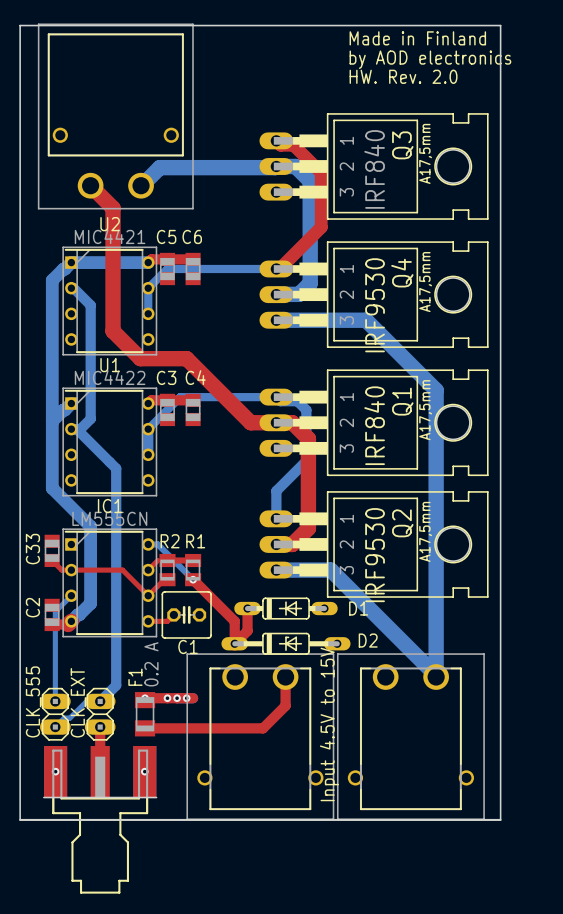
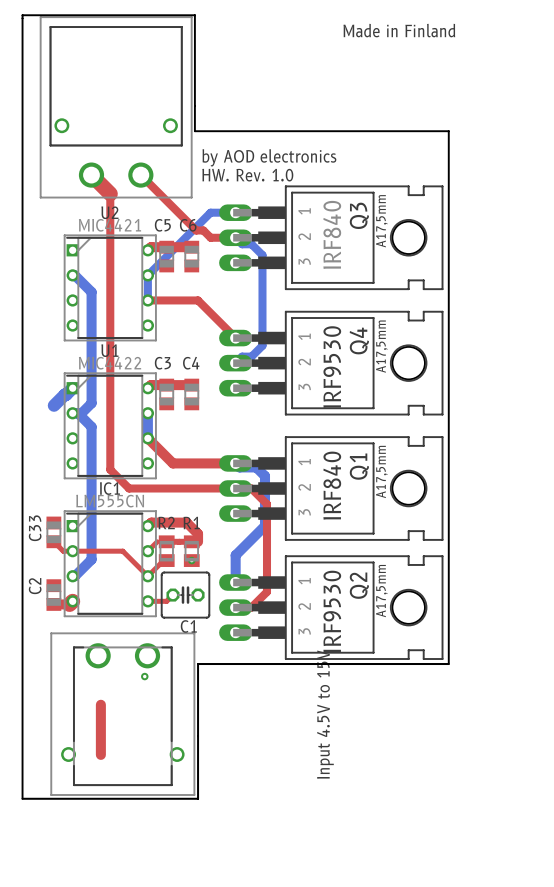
board edge: (20, 25) (500, 25) (500, 819) (20, 819) -> (22, 18) (22, 15) (194, 15) (194, 131) (448, 131) (448, 664) (198, 664) (198, 798) (22, 798) (22, 795)
text position: by AOD electronics (430, 59) -> by AOD electronics (269, 157)
text: HW. Rev. 2.0 (403, 76) -> none
top track: (276, 140) (280, 145) (293, 145) (321, 172) (321, 227) (279, 268) (276, 268) -> none
Q3 position: (373, 166) -> (331, 237)
top track: none -> (140, 175) (196, 230) (203, 230) (210, 237) (235, 237)
bottom track: (141, 185) (159, 167) (295, 166) (310, 181) (310, 283) (299, 294) (276, 294) -> none
text: none -> HW. Rev. 1.0 (247, 175)
top track: (109, 204) (113, 208) (113, 331) (140, 358) (186, 358) (250, 422) (292, 422) (308, 438) (308, 528) (292, 544) (276, 544) -> (110, 193) (110, 469) (129, 488) (251, 488) (267, 504) (267, 591) (251, 607) (235, 607)
bottom track: none -> (235, 237) (242, 244) (251, 244) (262, 255) (262, 345) (251, 356) (242, 356) (235, 363)
bottom track: (148, 262) (71, 262) (52, 280) (52, 488) (90, 526) (90, 603) (71, 621) -> none
bottom track: (167, 268) (276, 268) -> (166, 256) (210, 212) (235, 212)
Q4 position: (373, 294) -> (331, 363)
top track: none -> (147, 300) (198, 300) (235, 338)
bottom track: (276, 320) (366, 320) (436, 390) (436, 677) -> none
Q1 position: (373, 422) -> (331, 488)
bottom track: (148, 429) (180, 397) (276, 397) (280, 401) (297, 401) (306, 410) (306, 461) (276, 491) (276, 518) -> none
bottom track: (90, 443) (116, 468) (116, 685) (100, 701) (86, 701) (69, 718) (64, 718) (55, 727) -> (91, 426) (91, 559) (72, 576)
top track: none -> (147, 438) (172, 463) (235, 463)
bottom track: none -> (235, 463) (239, 467) (256, 467) (264, 476) (264, 525) (235, 555) (235, 582)
top track: none -> (147, 526) (151, 522) (186, 522) (198, 533) (198, 541)
bottom track: (148, 544) (157, 544) (193, 579) -> none
Q2 position: (373, 544) -> (331, 607)
bottom track: (276, 570) (330, 570) (436, 675) -> none
top track: (193, 579) (234, 621) (234, 645) -> none
bottom track: (71, 595) (55, 611) (55, 701) -> none
top track: (247, 608) (247, 630) (234, 643) -> none
D1: (285, 608) -> none
D2: (285, 643) -> none
top track: (285, 677) (285, 705) (263, 728) (145, 728) -> none
via: (167, 698) -> none
via: (177, 698) -> none
via: (186, 698) -> none
top track: (193, 698) (146, 698) (145, 700) -> none
CLK_555: (55, 714) -> none
CLK_EXT: (100, 714) -> none
F1: 0.2 A (145, 714) -> none
part position: (260, 736) -> (122, 714)
part: (410, 736) -> none
via: (55, 771) -> none
via: (144, 771) -> none
part: (100, 819) -> none

